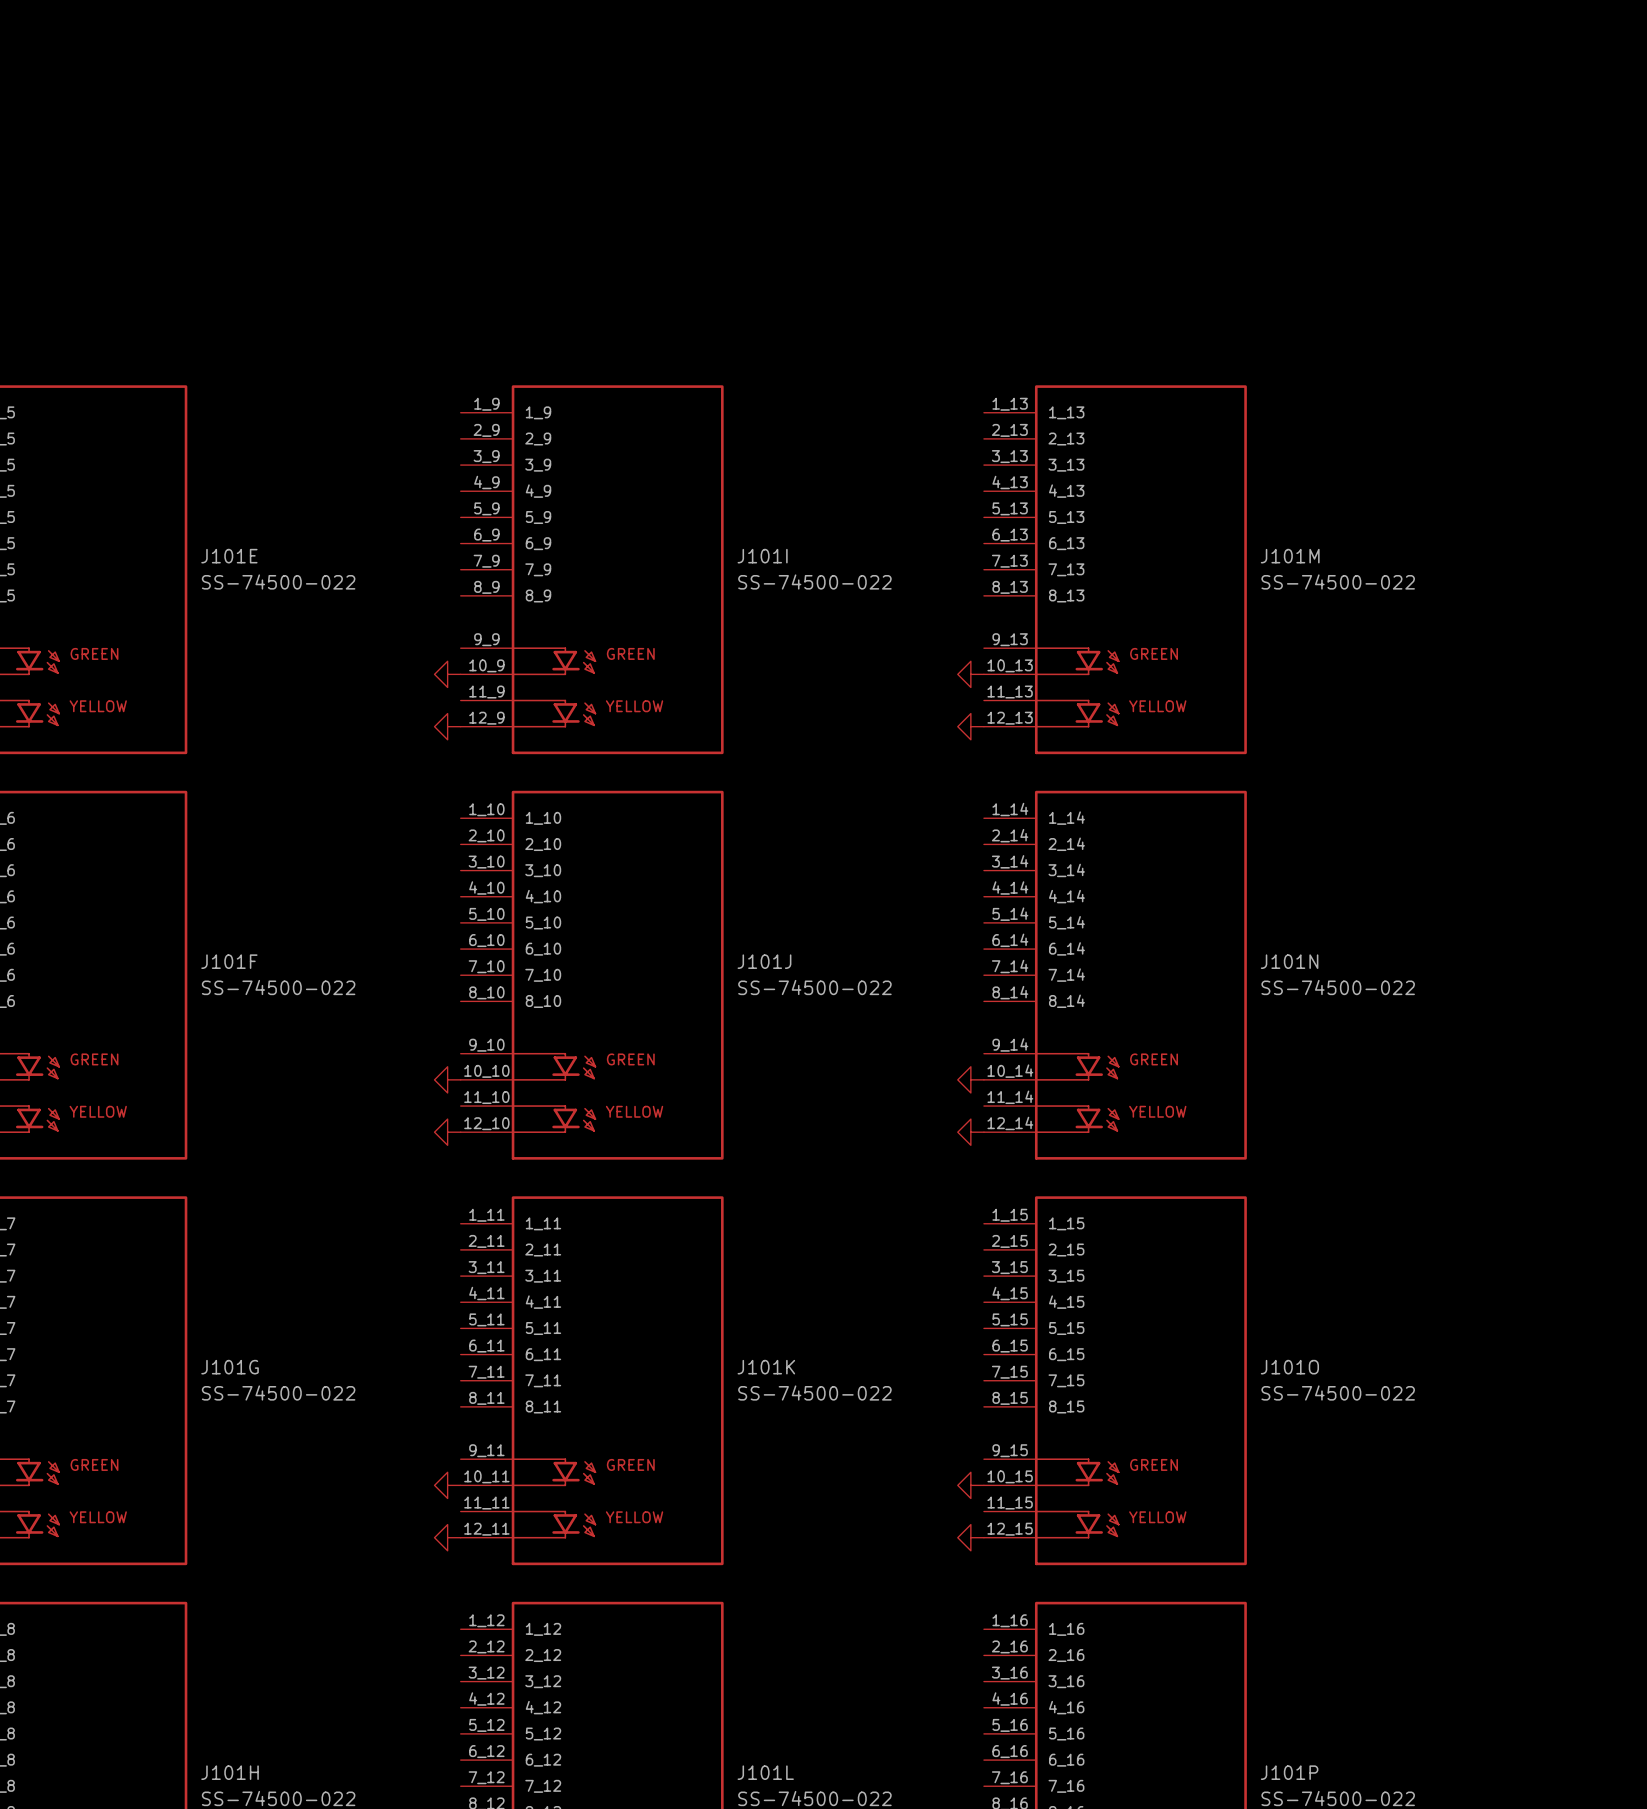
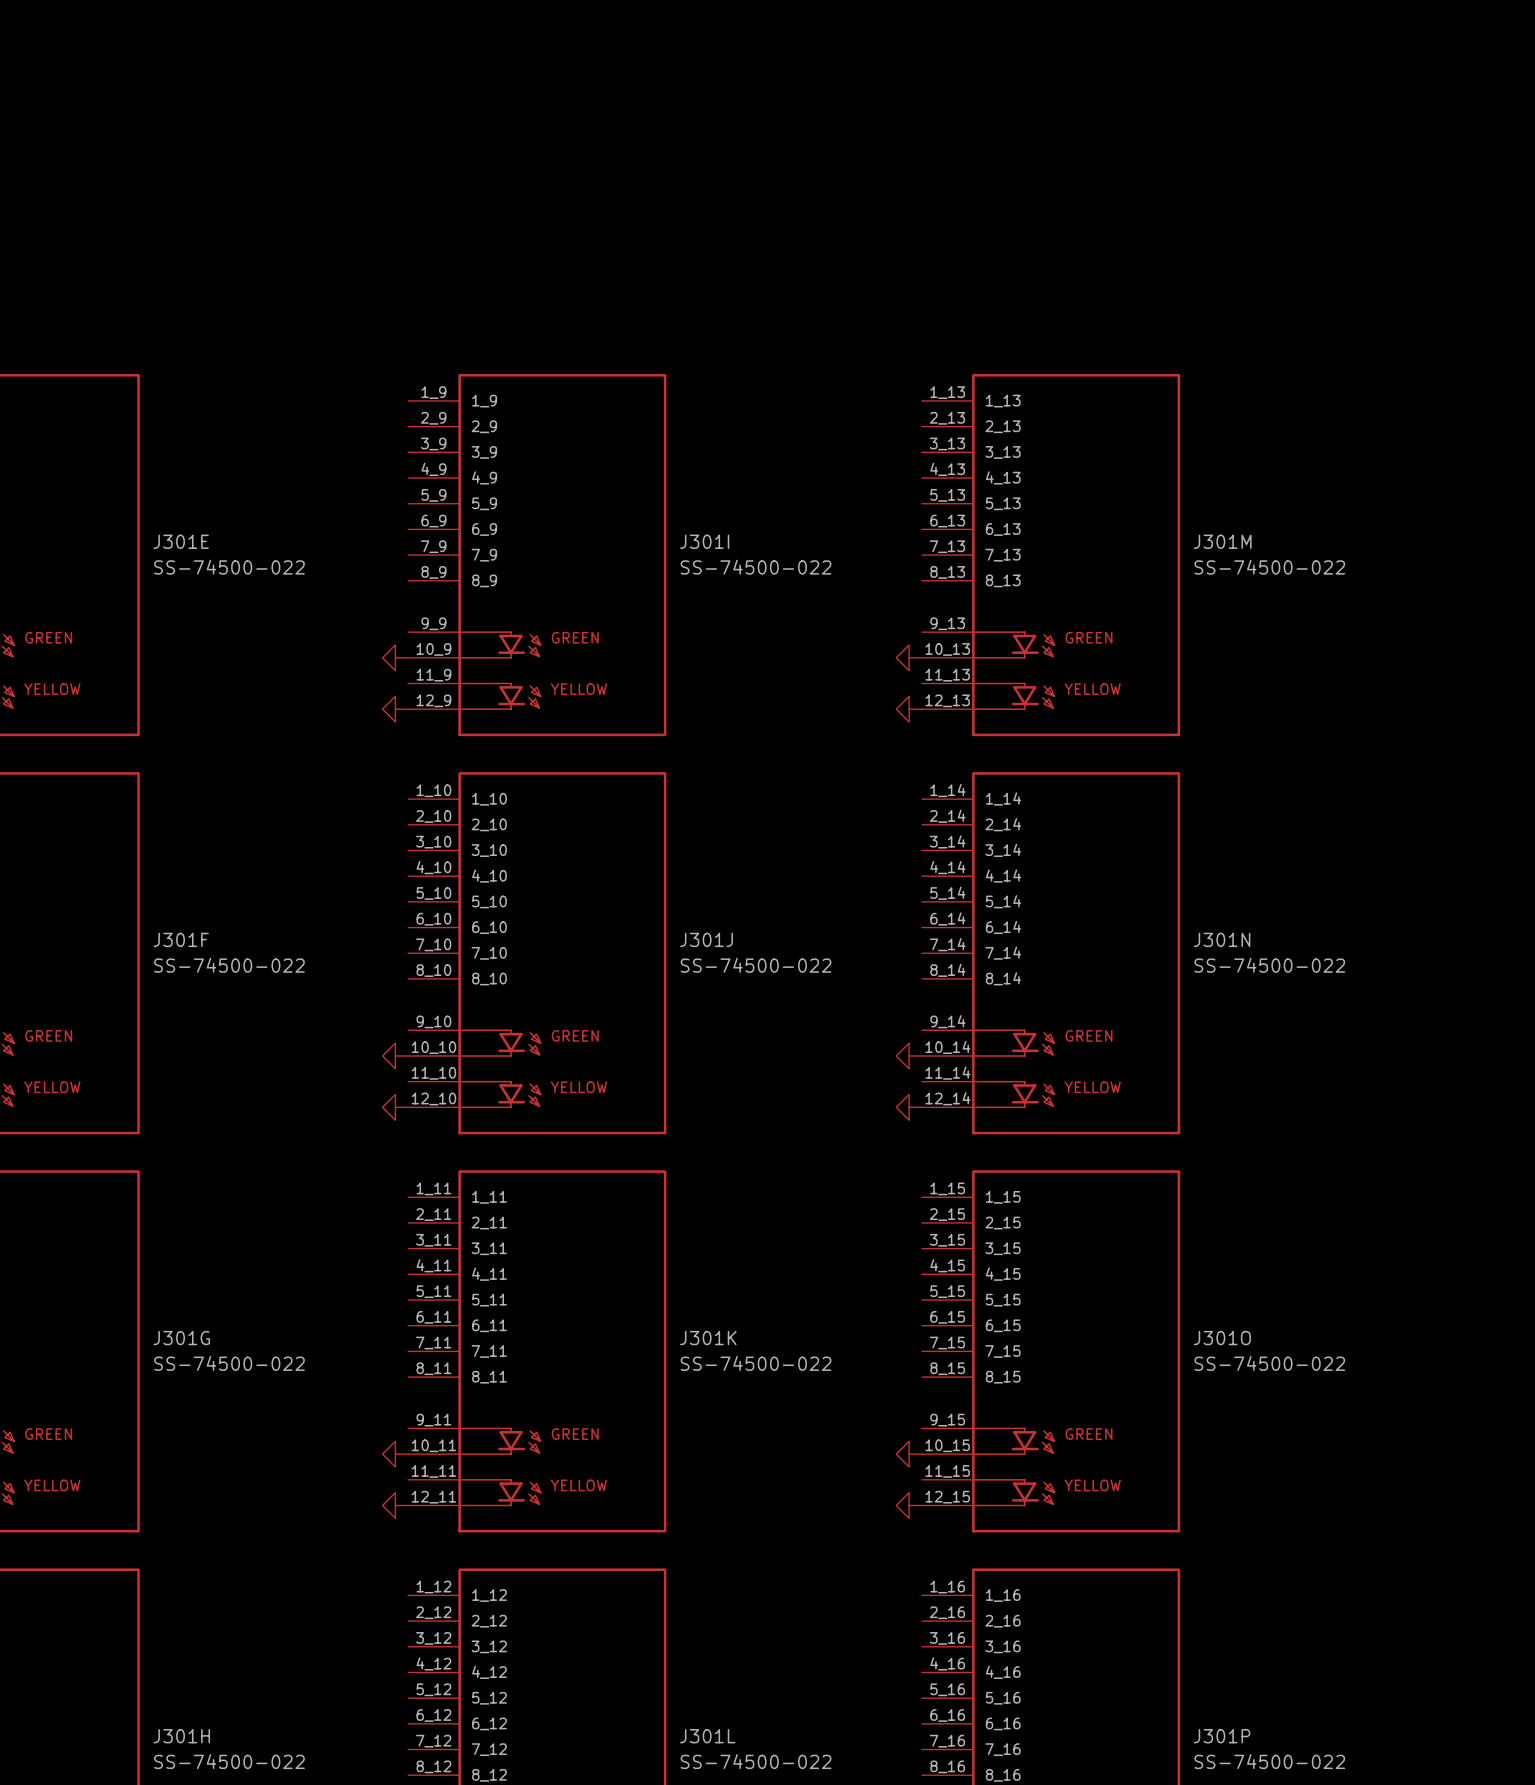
J101E name: J101E (229, 556) -> J301E (181, 541)
J101I name: J101I (762, 556) -> J301I (704, 541)
J101M name: J101M (1290, 556) -> J301M (1222, 541)
J101F name: J101F (229, 961) -> J301F (181, 939)
J101J name: J101J (764, 961) -> J301J (706, 939)
J101N name: J101N (1289, 961) -> J301N (1222, 939)
J101G name: J101G (230, 1367) -> J301G (181, 1338)
J101K name: J101K (766, 1367) -> J301K (708, 1338)
J101O name: J101O (1289, 1367) -> J301O (1222, 1338)
J101H name: J101H (230, 1772) -> J301H (181, 1736)
J101L name: J101L (765, 1772) -> J301L (707, 1736)
J101P name: J101P (1289, 1772) -> J301P (1222, 1736)

